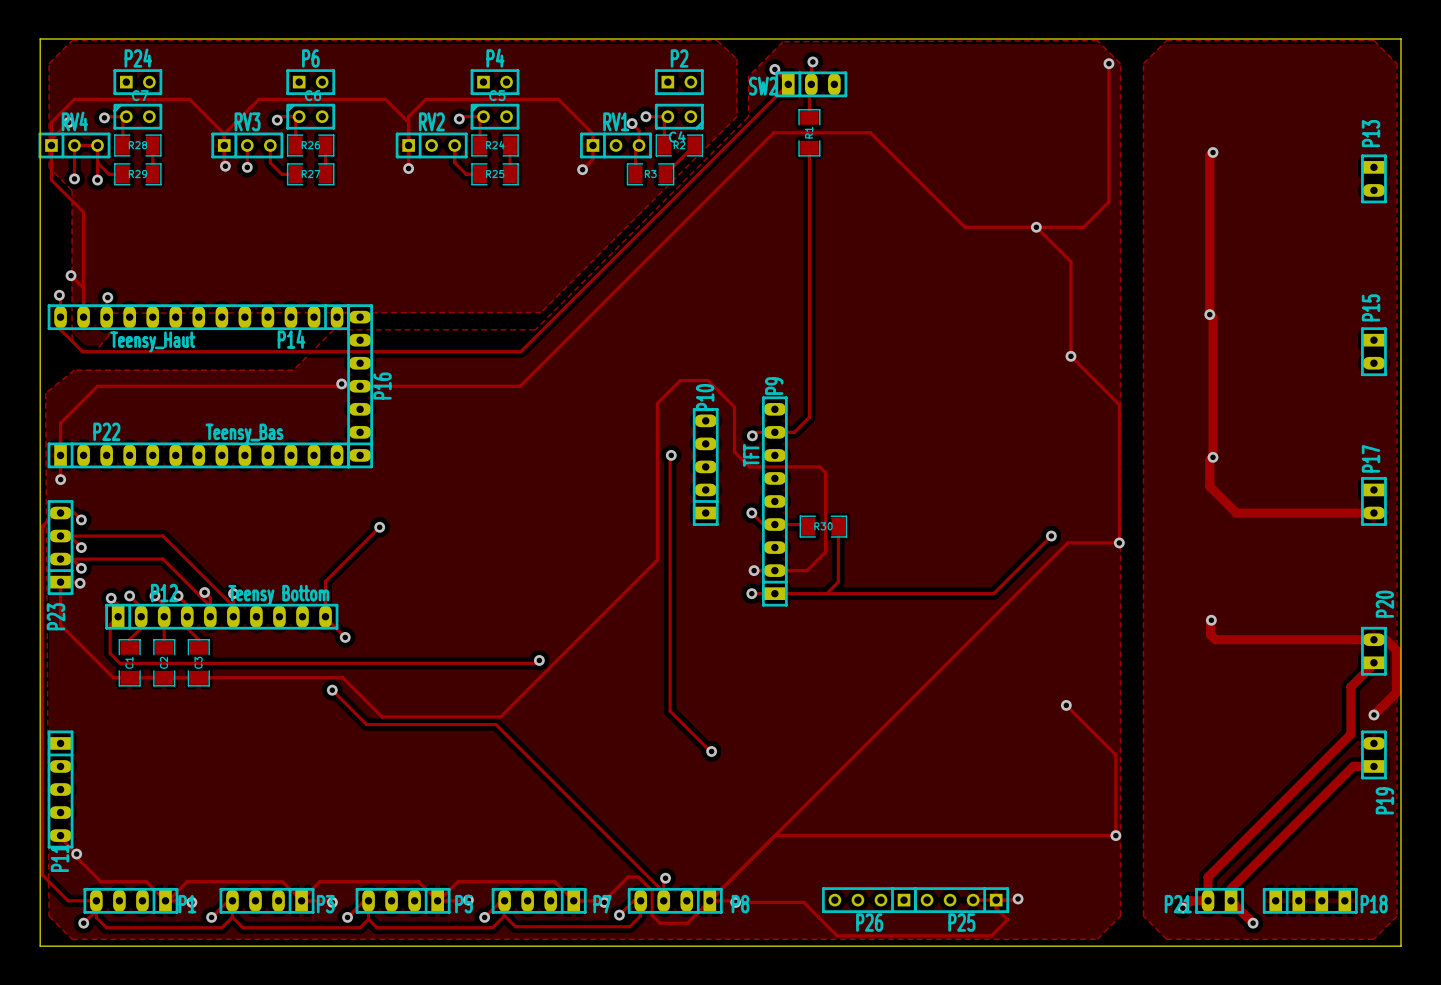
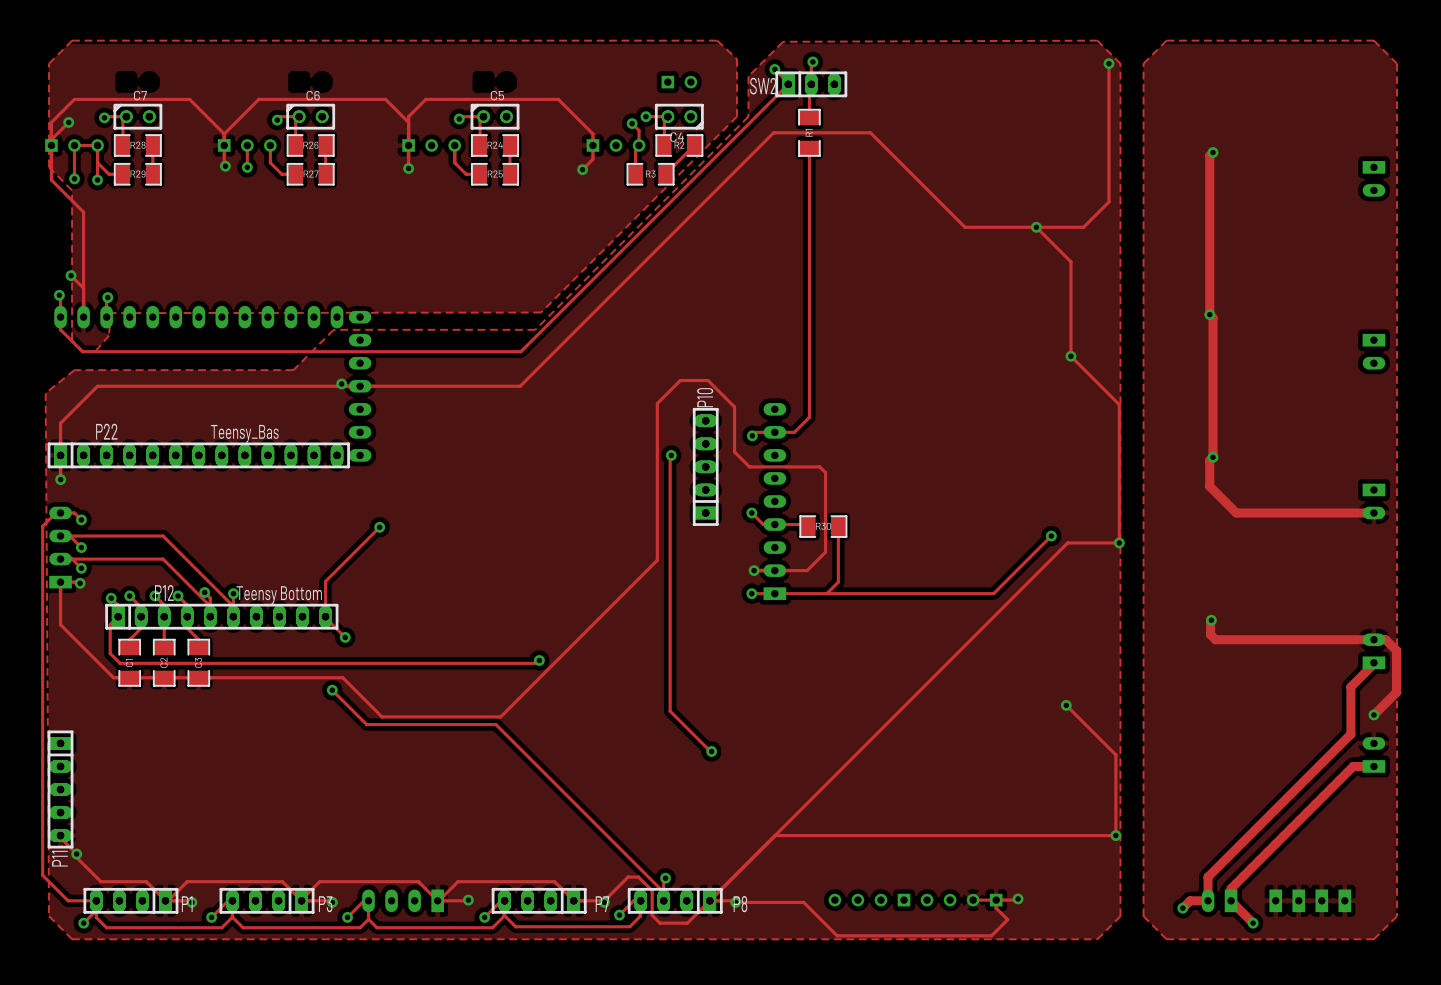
board edge: (40, 39) (1400, 39) (1400, 946) (40, 946) (40, 39) -> none
P24: (137, 82) -> none
P6: (310, 82) -> none
P4: (495, 82) -> none
P2: (679, 82) -> none
part: none -> (811, 84)
part: none -> (137, 116)
part: none -> (310, 116)
part: none -> (495, 116)
part: none -> (679, 116)
part: none -> (809, 132)
RV4: (74, 145) -> none
part: none -> (137, 145)
RV3: (247, 145) -> none
part: none -> (310, 145)
RV2: (431, 145) -> none
part: none -> (495, 145)
RV1: (615, 145) -> none
part: none -> (679, 145)
part: none -> (137, 174)
part: none -> (310, 174)
part: none -> (495, 174)
part: none -> (650, 174)
P13: (1373, 178) -> none
part: none -> (1373, 178)
P14: Teensy_Haut (198, 317) -> none
part: none -> (198, 317)
P15: (1373, 351) -> none
part: none -> (1373, 351)
P16: (360, 386) -> none
part: none -> (360, 386)
part: none -> (198, 455)
part: none -> (705, 466)
P9: TFT (774, 501) -> none
part: none -> (774, 501)
P17: (1373, 501) -> none
part: none -> (1373, 501)
part: none -> (823, 526)
P23: (60, 547) -> none
part: none -> (60, 547)
part: none -> (221, 616)
P20: (1373, 651) -> none
part: none -> (1373, 651)
part: none -> (129, 662)
part: none -> (164, 662)
part: none -> (198, 662)
P19: (1373, 754) -> none
part: none -> (1373, 754)
part: none -> (60, 789)
part: none -> (130, 900)
part: none -> (267, 900)
P5: (403, 900) -> none
part: none -> (403, 900)
part: none -> (539, 900)
part: none -> (675, 900)
P26: (869, 900) -> none
P25: (961, 900) -> none
P21: (1219, 900) -> none
part: none -> (1219, 900)
P18: (1310, 900) -> none
part: none -> (1310, 900)

